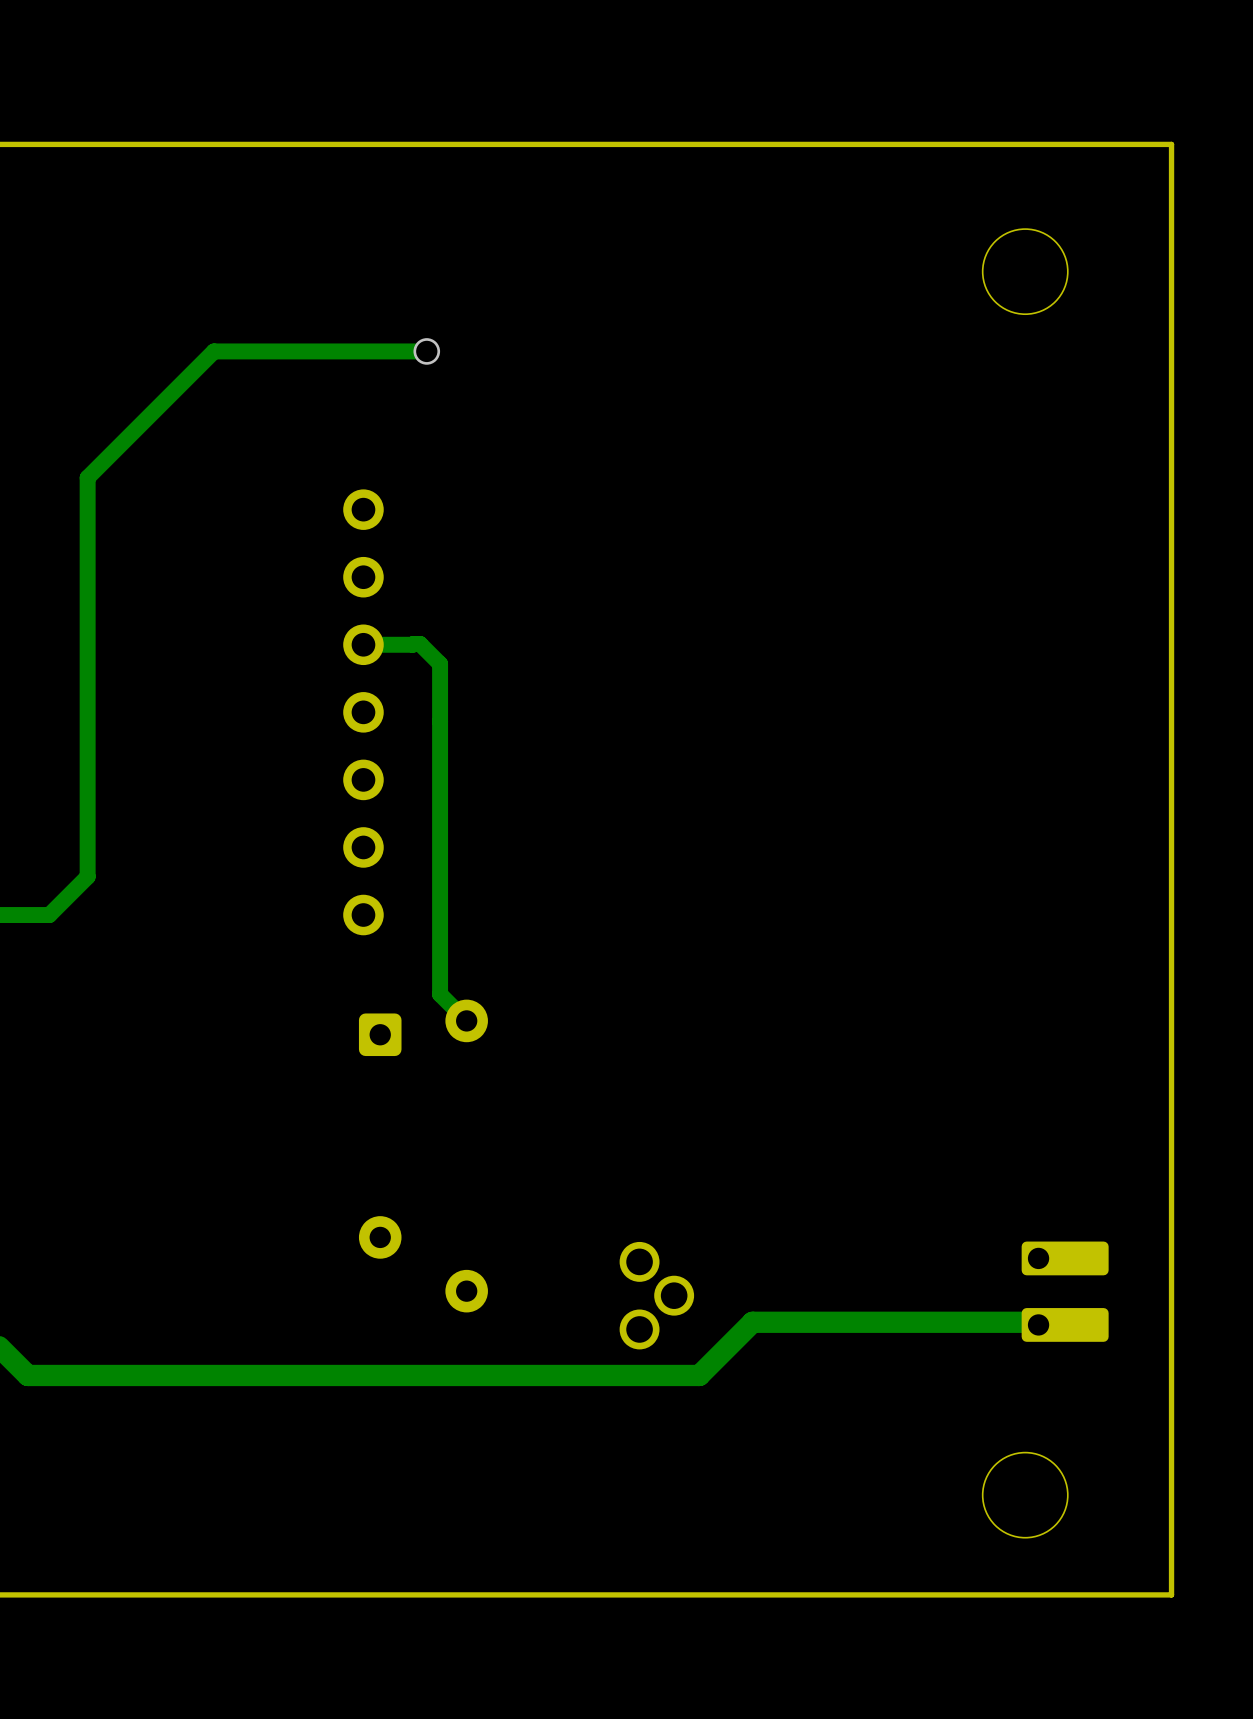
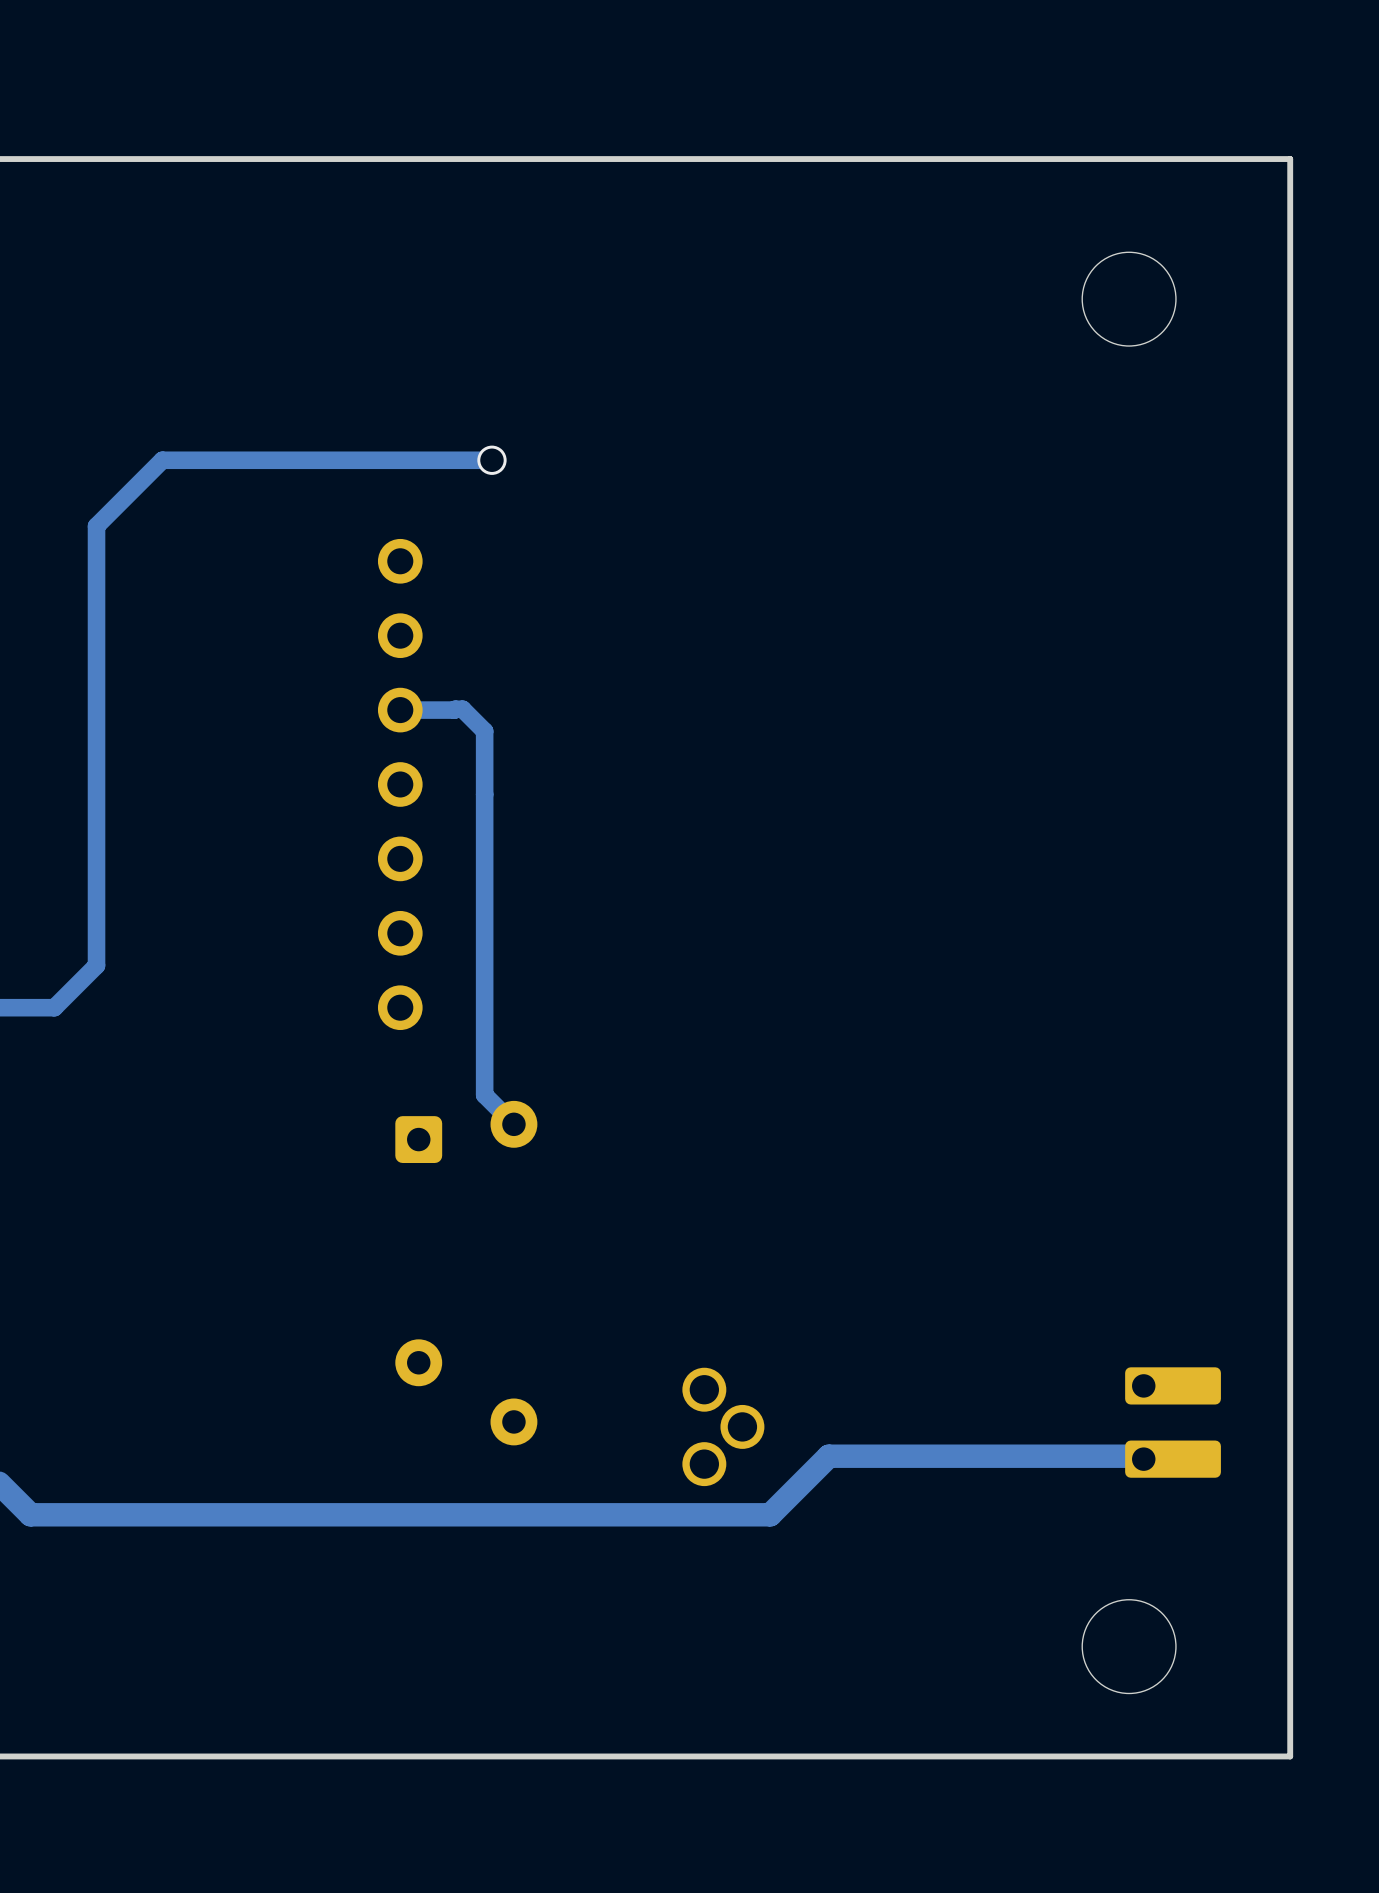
track: (426, 351) (213, 351) (147, 417) -> (491, 460) (162, 460)
via position: (426, 351) -> (491, 460)

